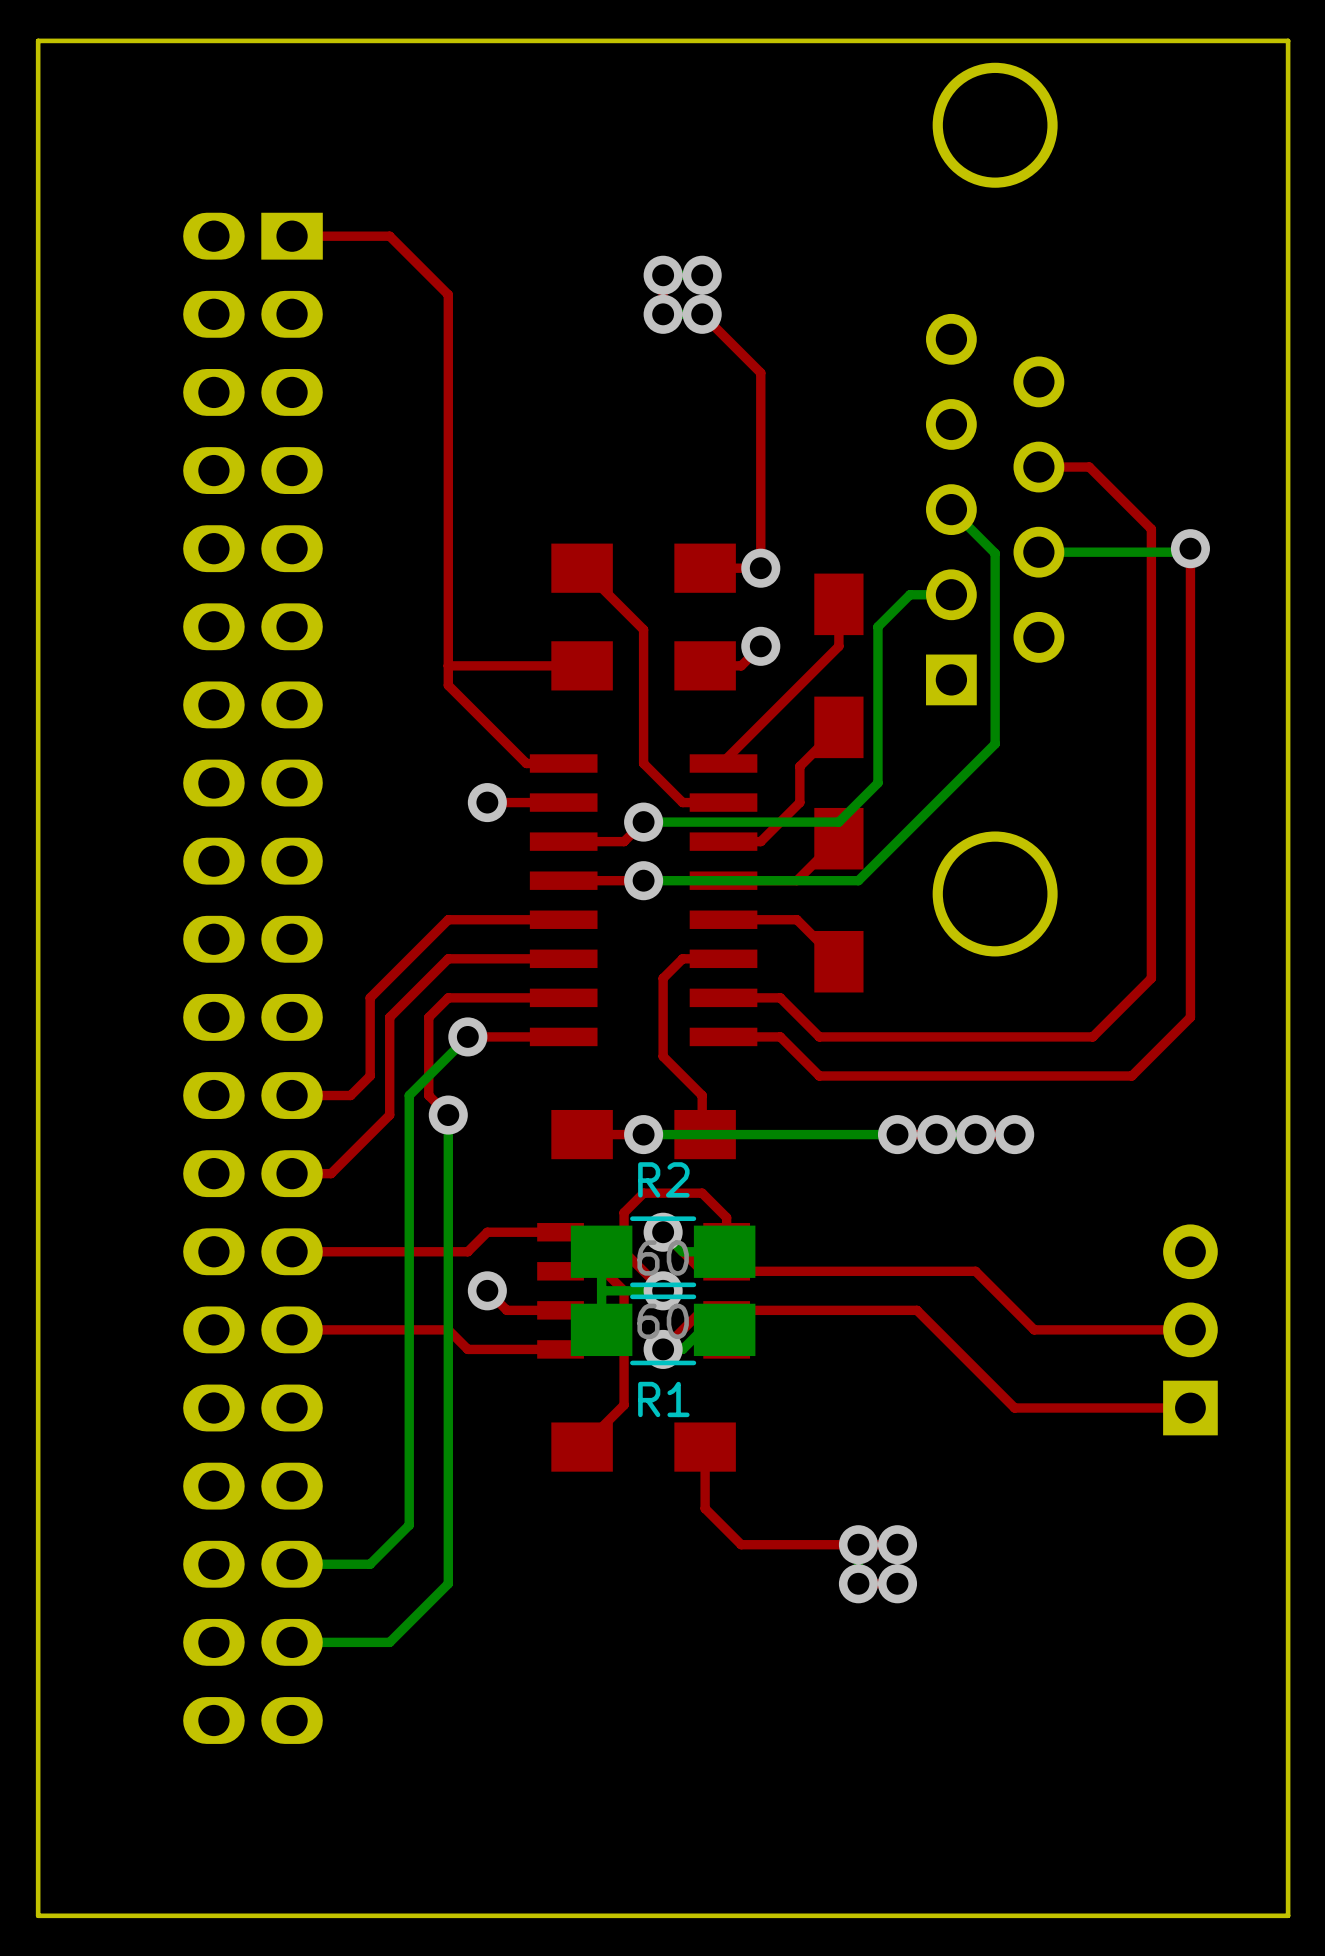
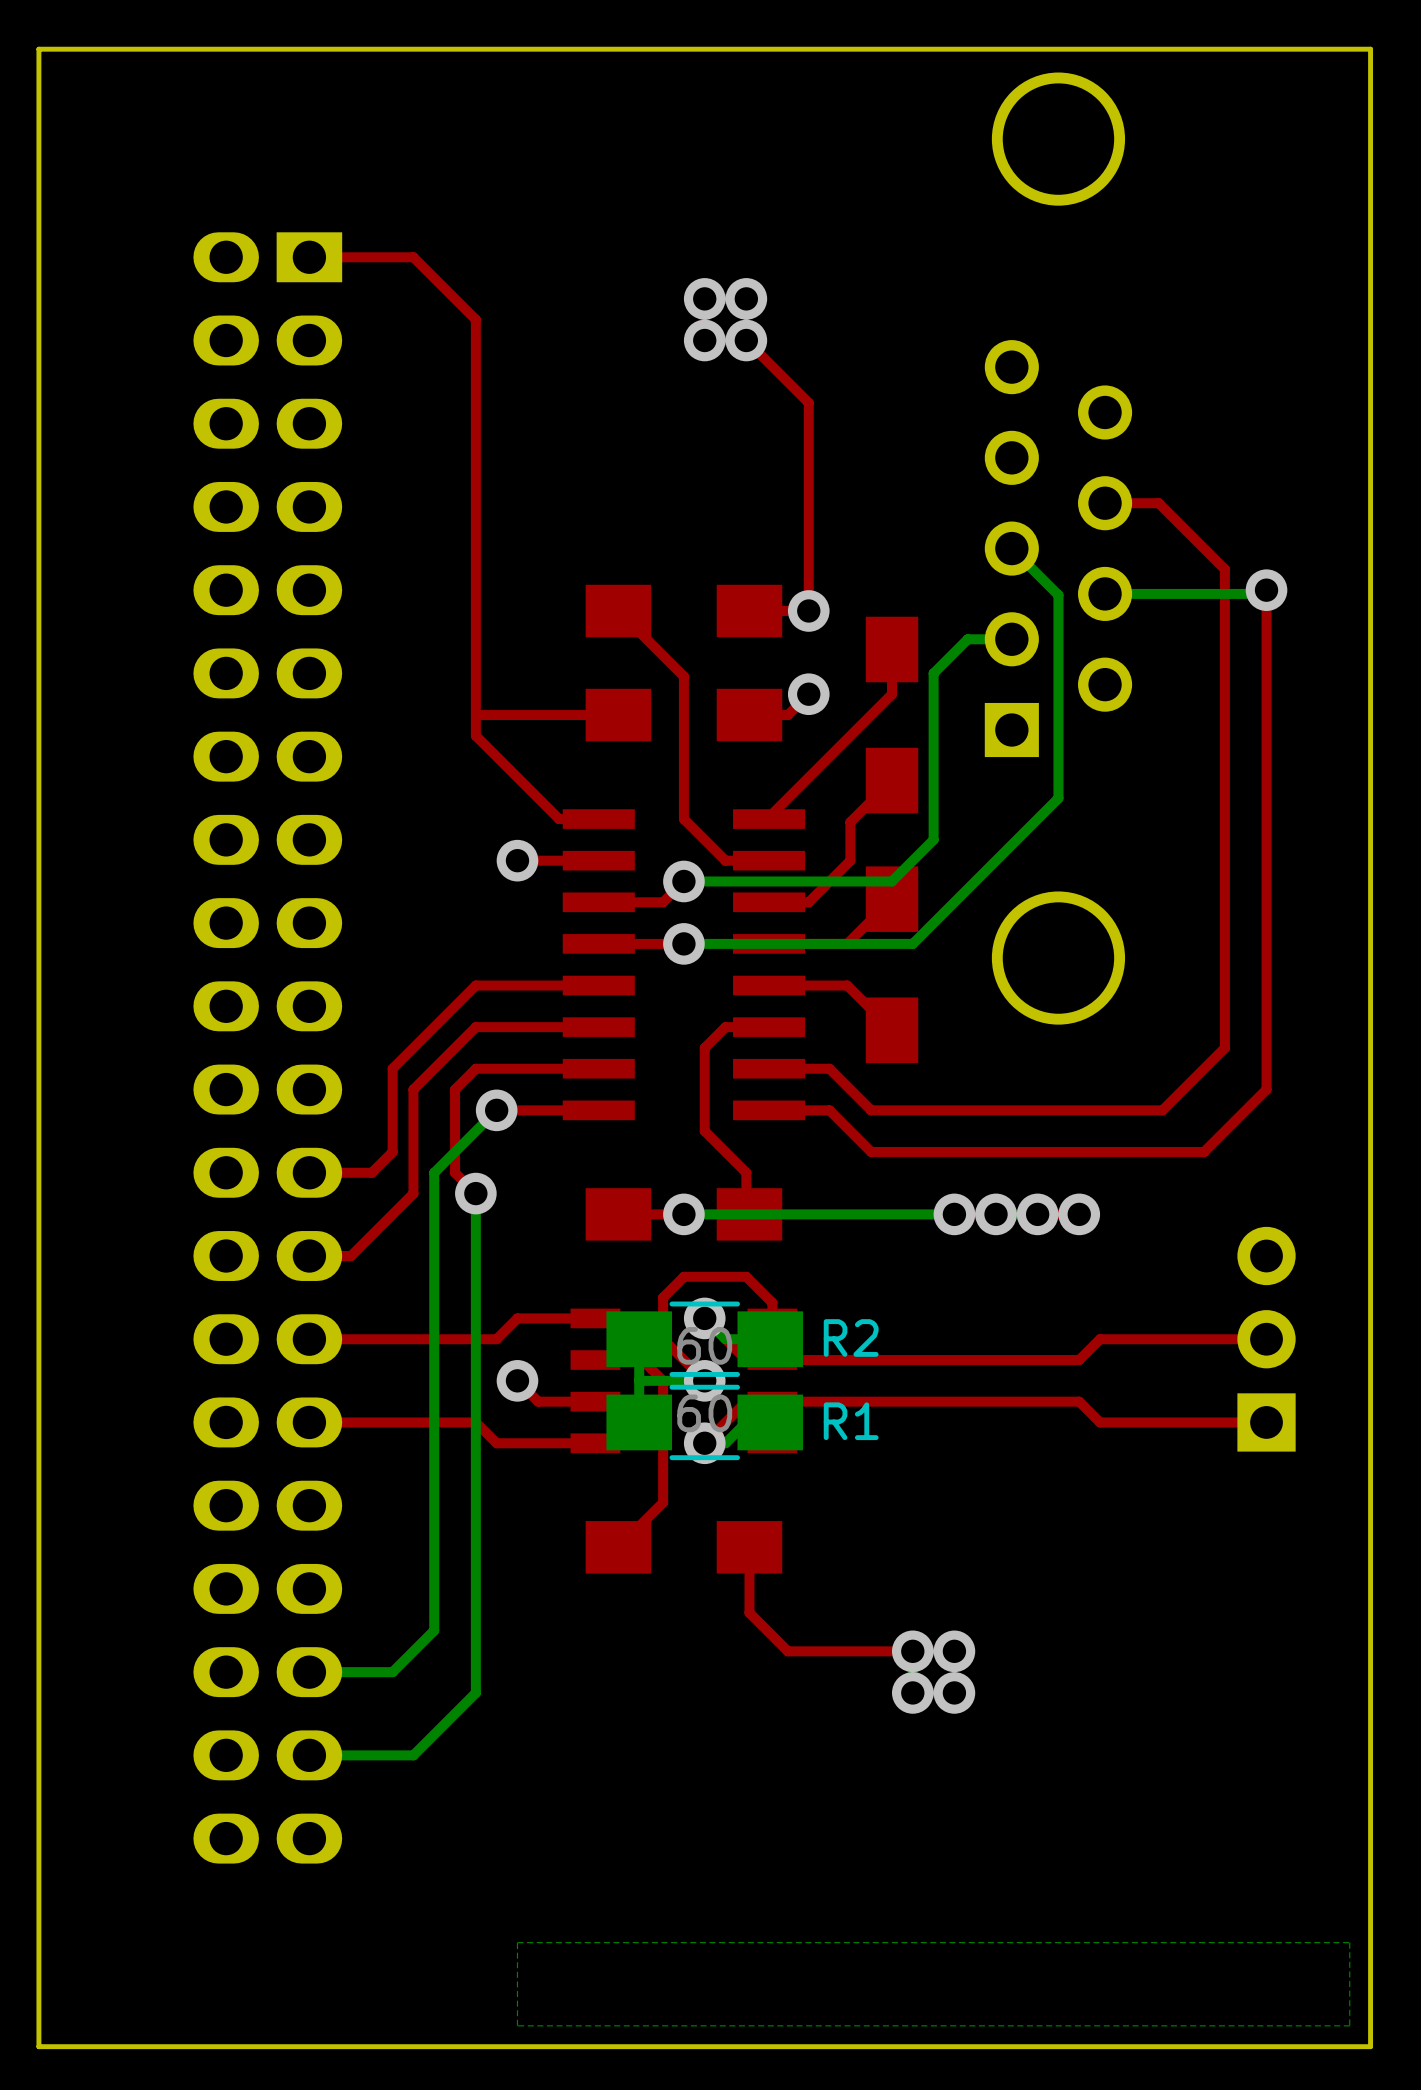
R2 name position: R2 (663, 1179) -> R2 (851, 1338)
top track: none -> (1266, 1339) (1100, 1339) (1079, 1360) (1037, 1360)
top track: (975, 1271) (1014, 1310) -> (975, 1401) (1079, 1401)
top track: (917, 1310) (1014, 1408) (1190, 1408) -> none
part position: (1190, 1329) -> (1266, 1339)
R1 name position: R1 (663, 1399) -> R1 (851, 1421)
bottom zone outline: none -> (1349, 1942) (1349, 2025) (517, 2025) (517, 1942) (1349, 1942)

